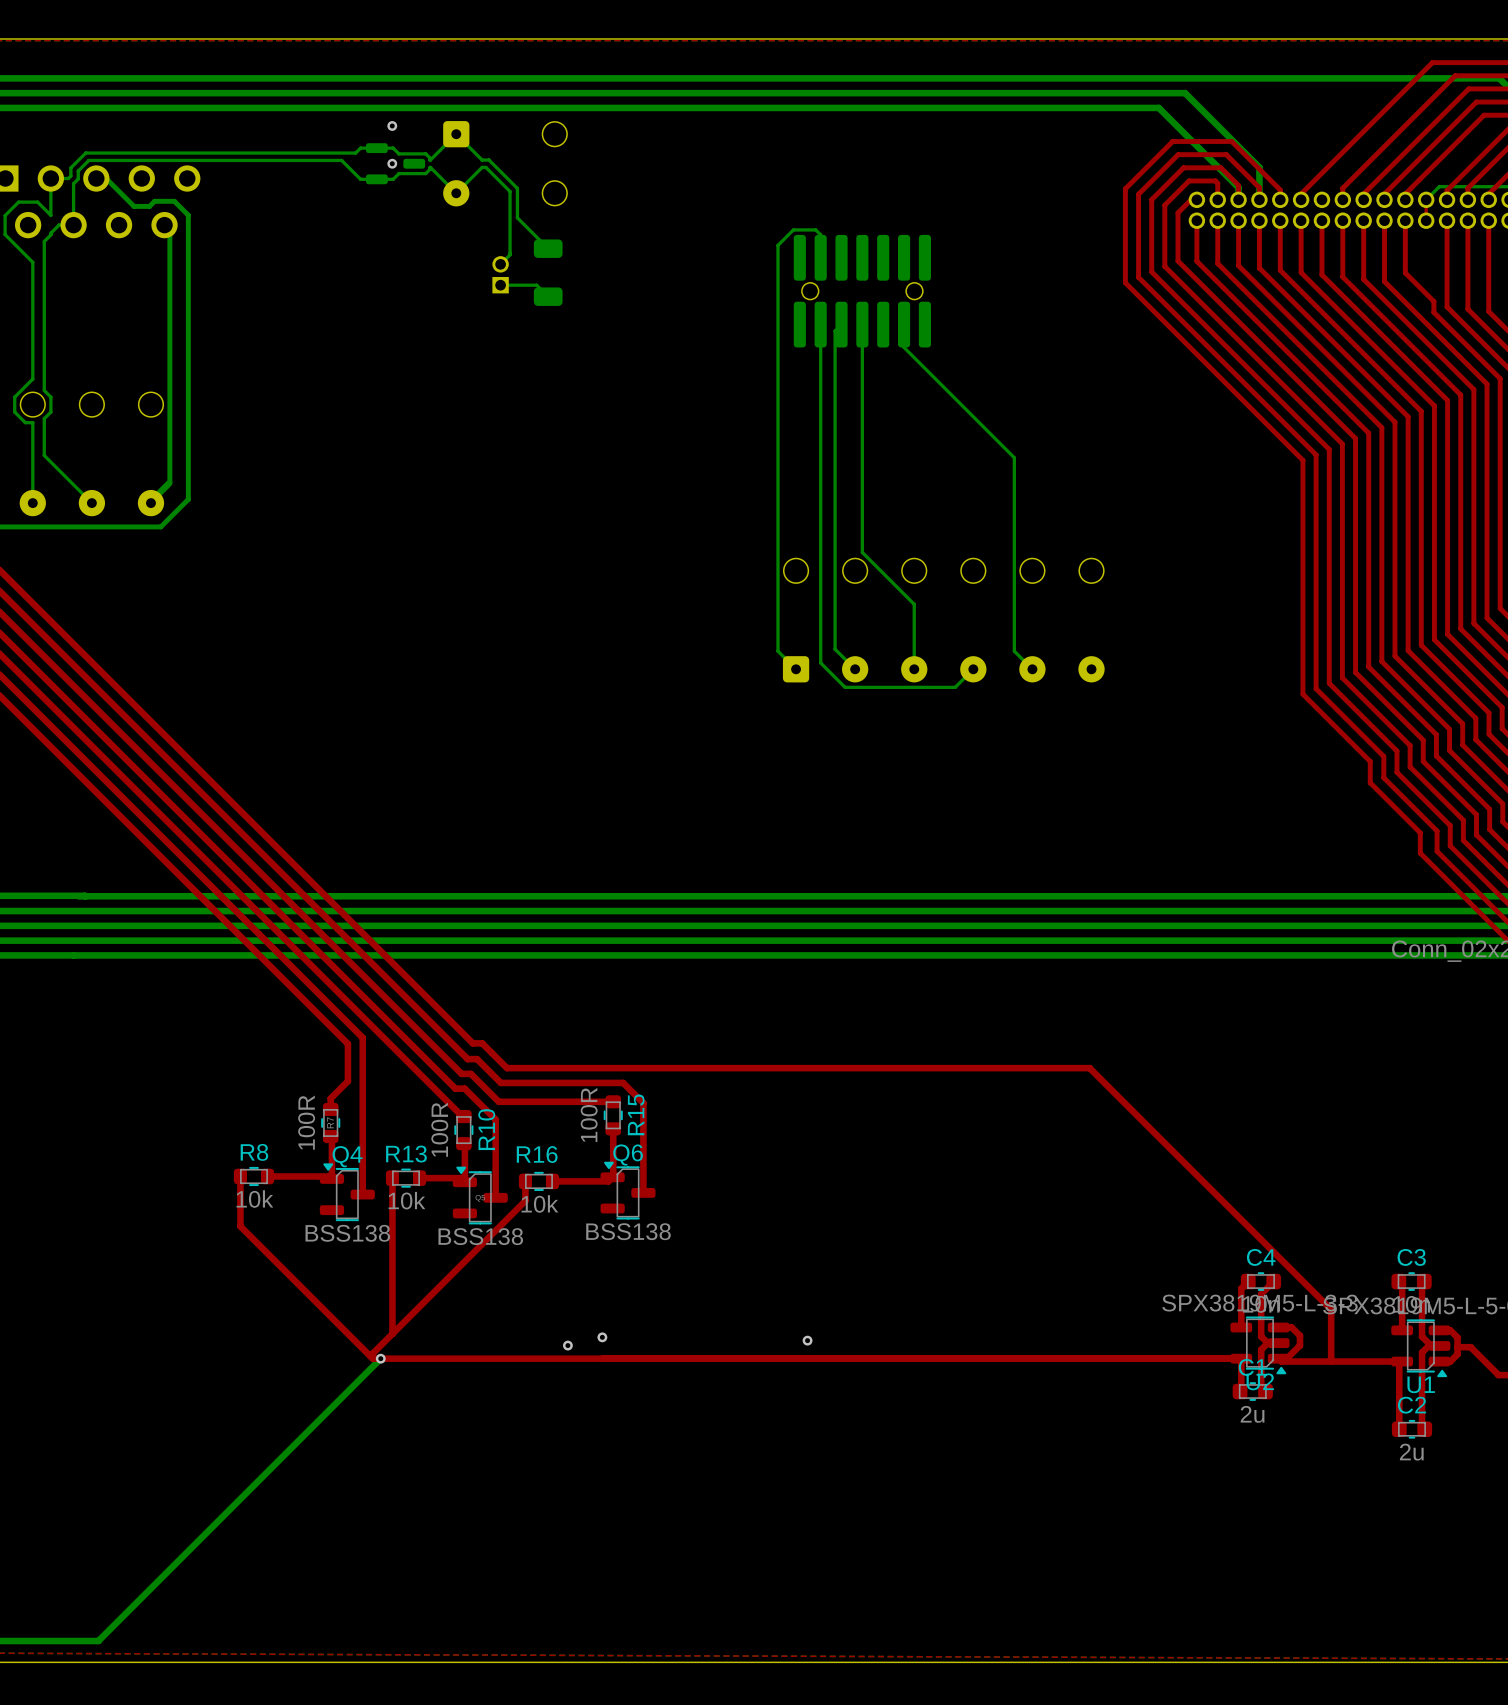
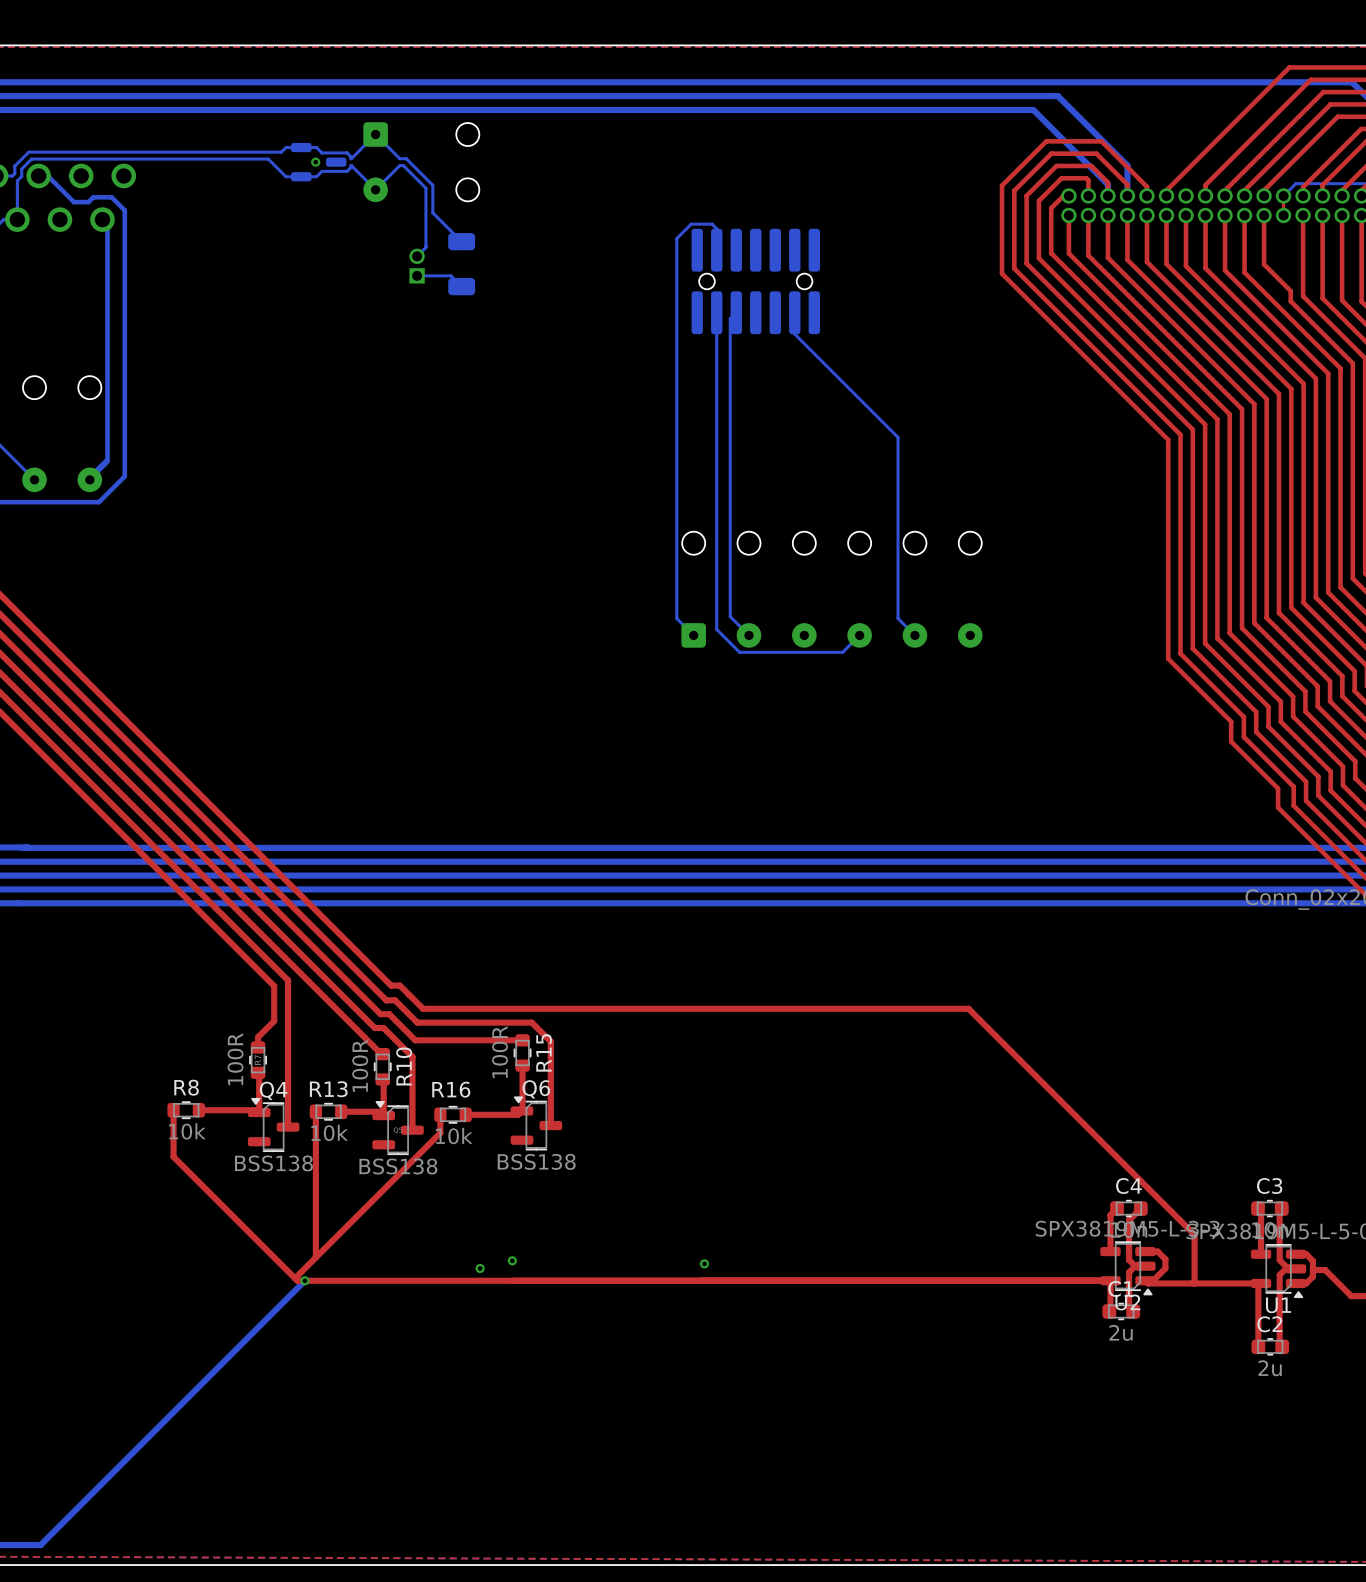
via: (392, 125) -> none
bottom track: (862, 324) (862, 552) (914, 604) (914, 669) -> none

